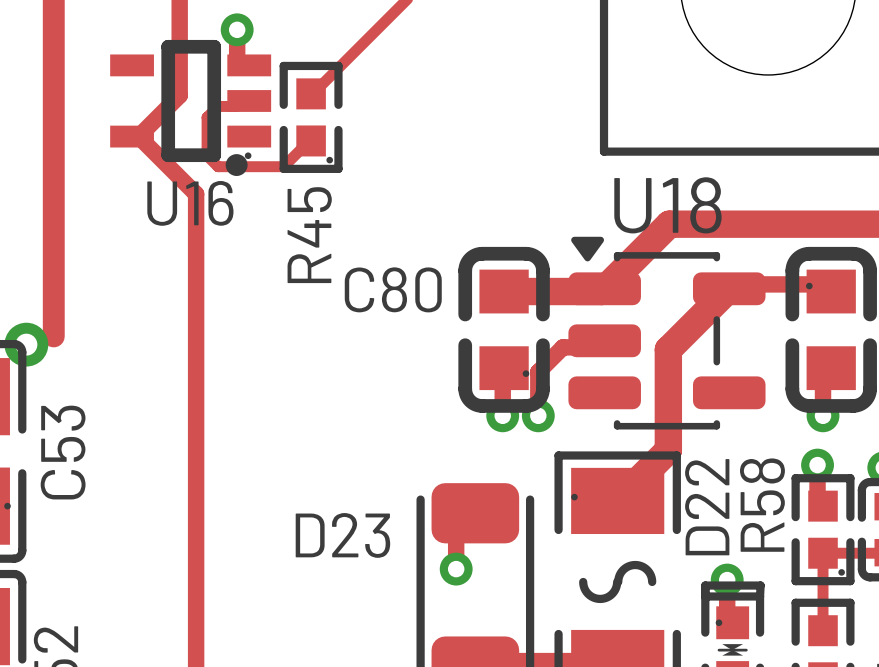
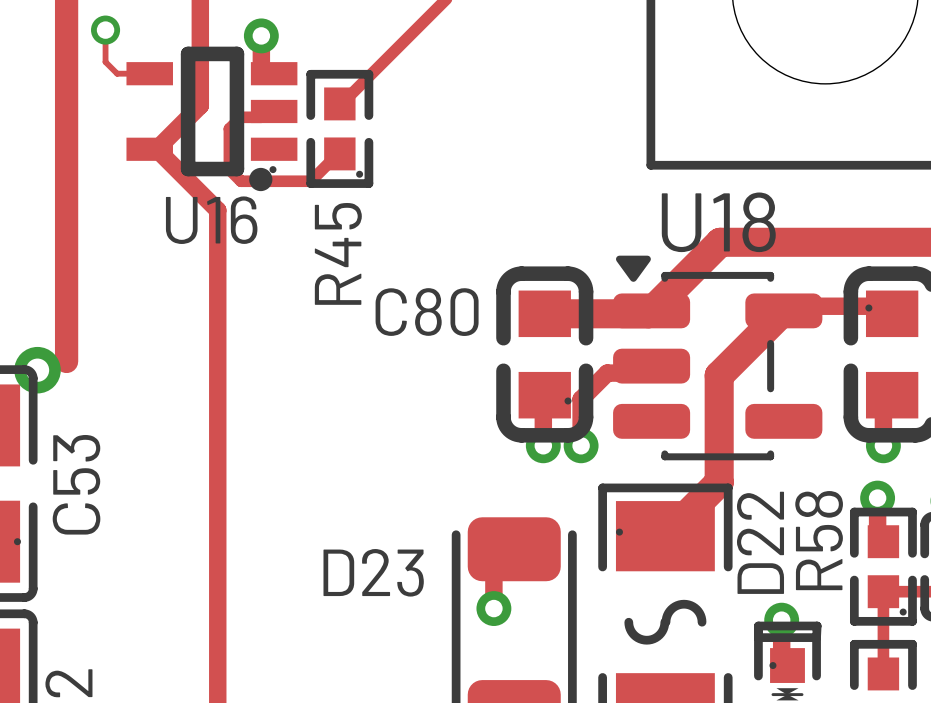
track: none -> (105, 30) (105, 62) (117, 73) (149, 73)
via: none -> (105, 30)

